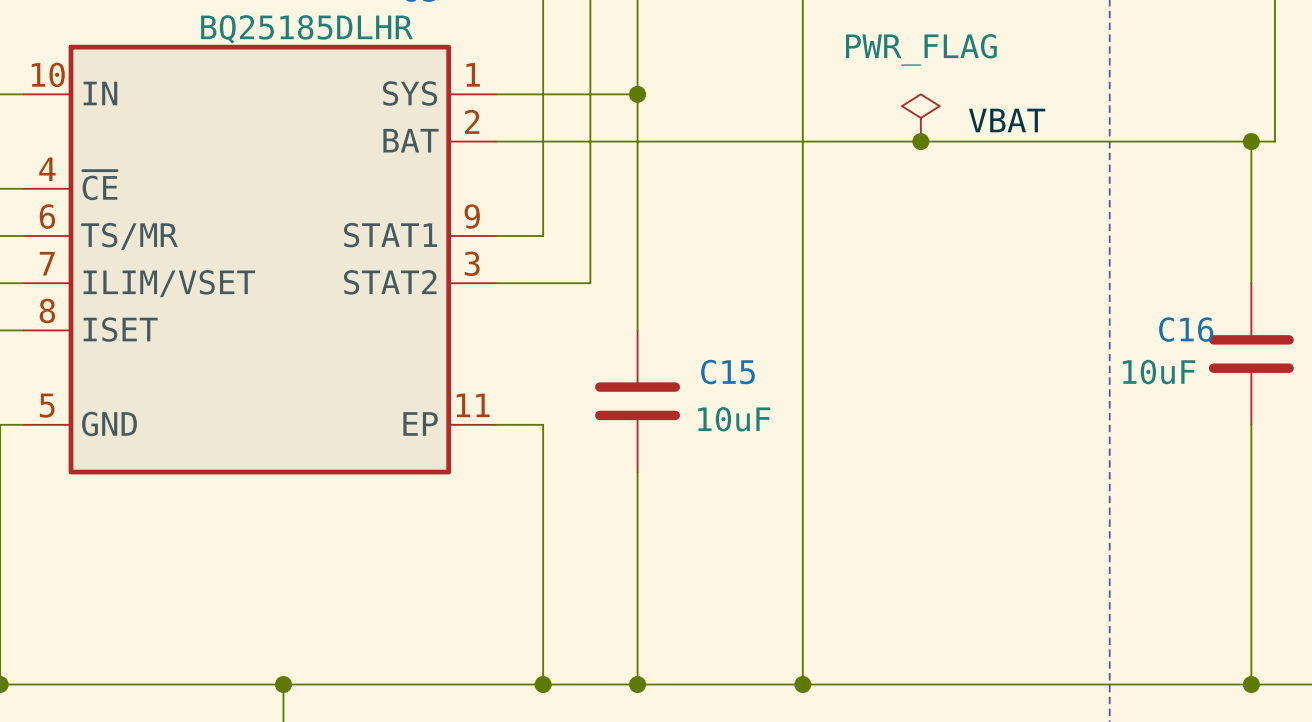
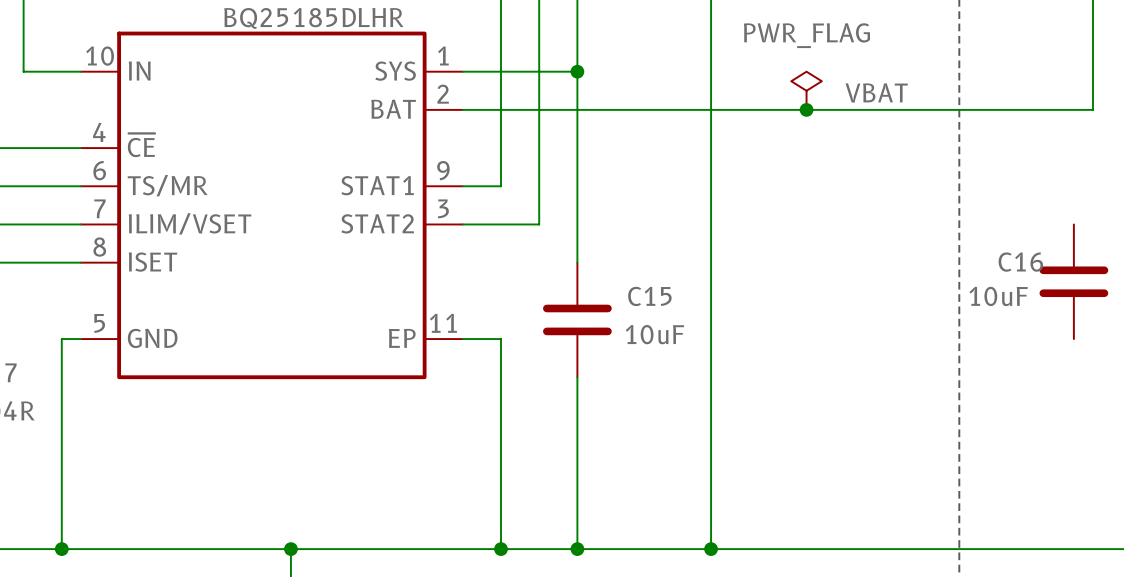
wire: (1251, 141) (1251, 283) -> none
junction: (1251, 141) -> none
wire: (1251, 424) (1251, 684) -> none
junction: (1251, 684) -> none

